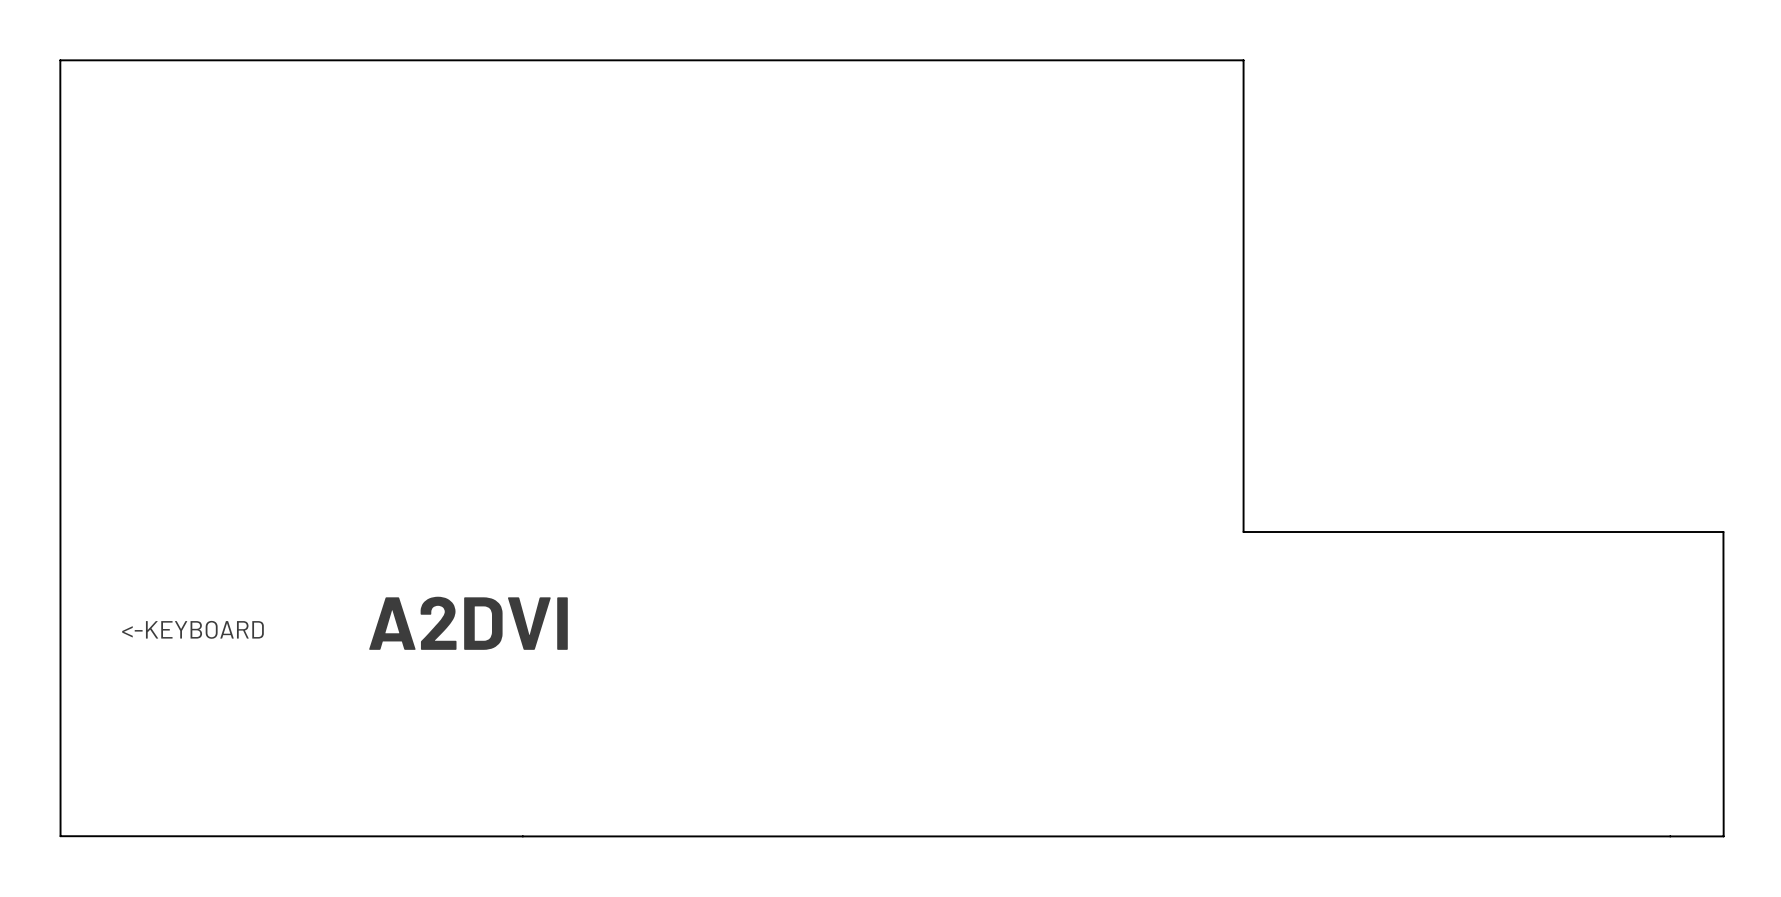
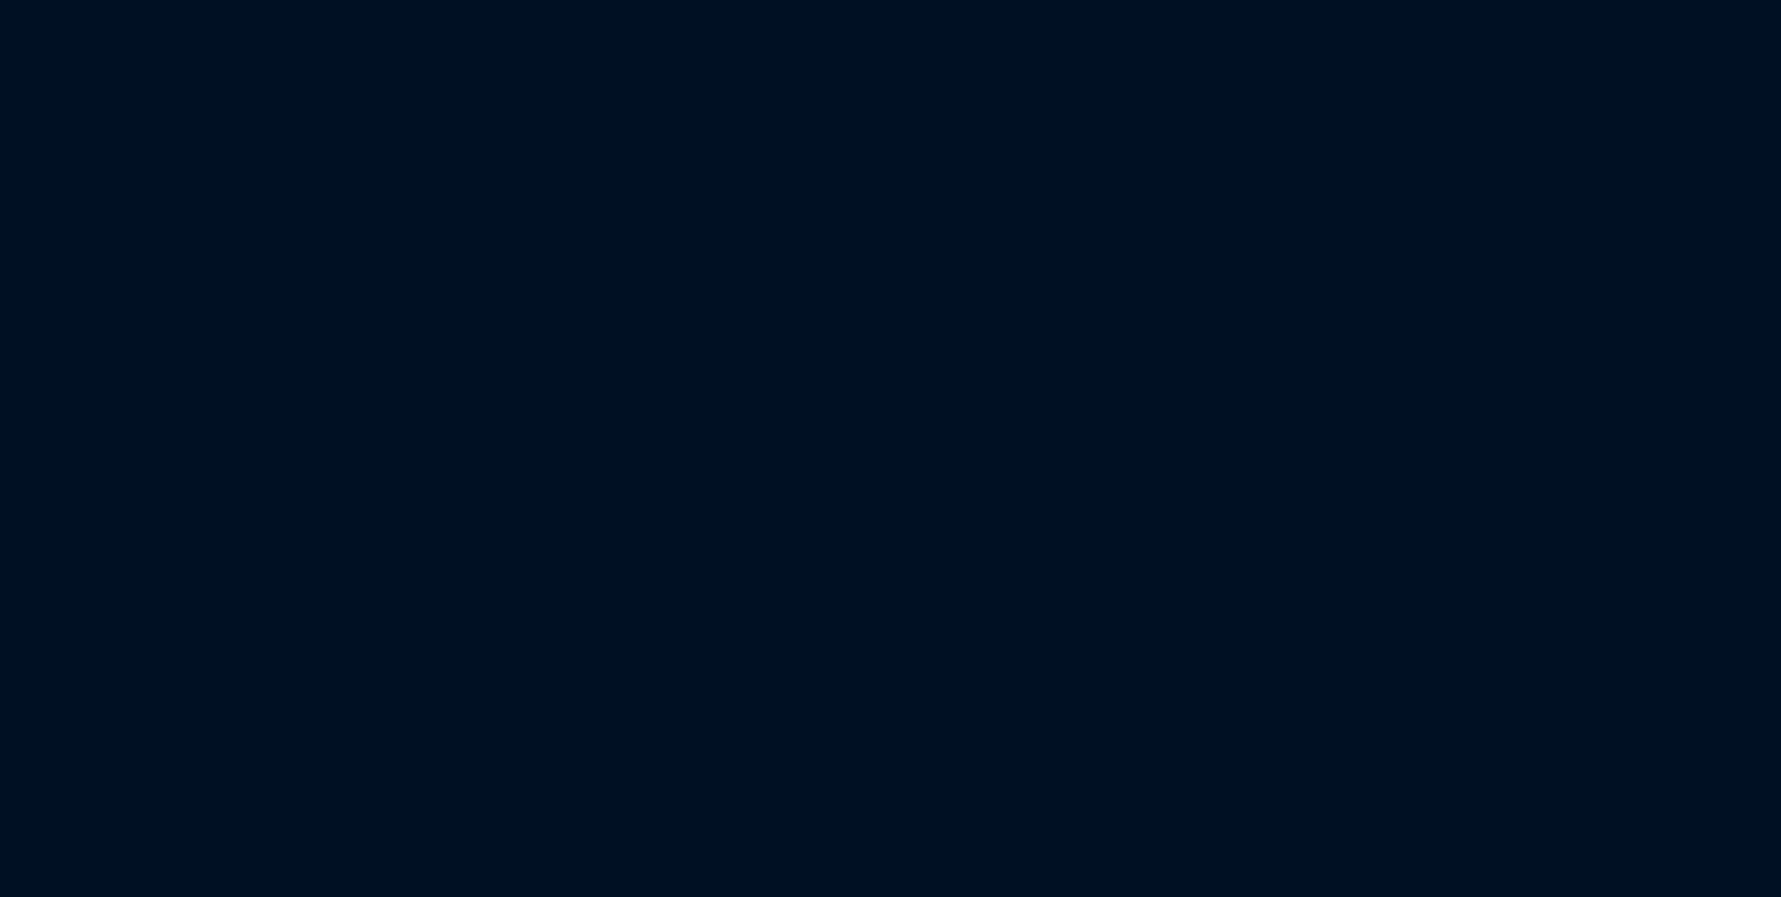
board edge: (60, 60) (60, 836) (1723, 836) (1723, 532) (1243, 532) (1243, 60) (60, 60) -> none
text: A2DVI (468, 623) -> none
text: <-KEYBOARD (193, 629) -> none

